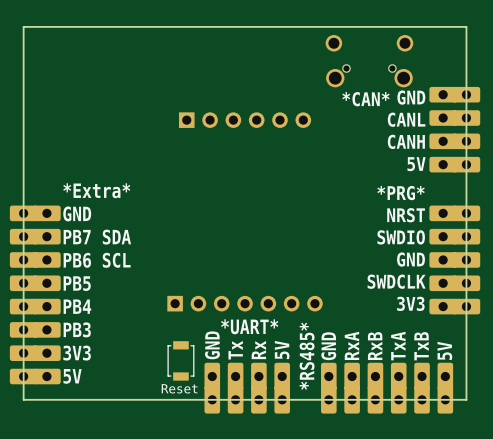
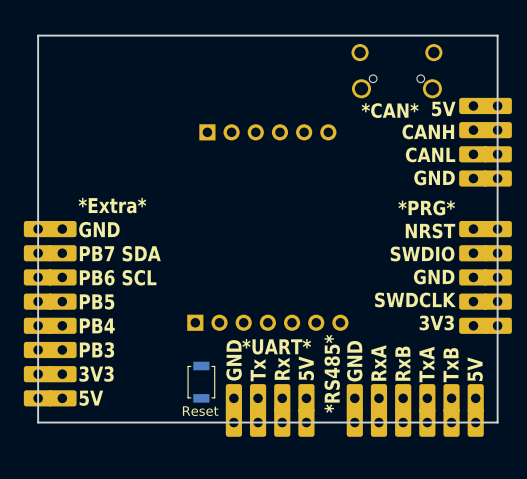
text: GND (411, 97) -> 5V (443, 109)
text: CANL (406, 119) -> CANH (428, 131)
text: CANH (406, 141) -> CANL (430, 154)
text: 5V (416, 164) -> GND (434, 177)

